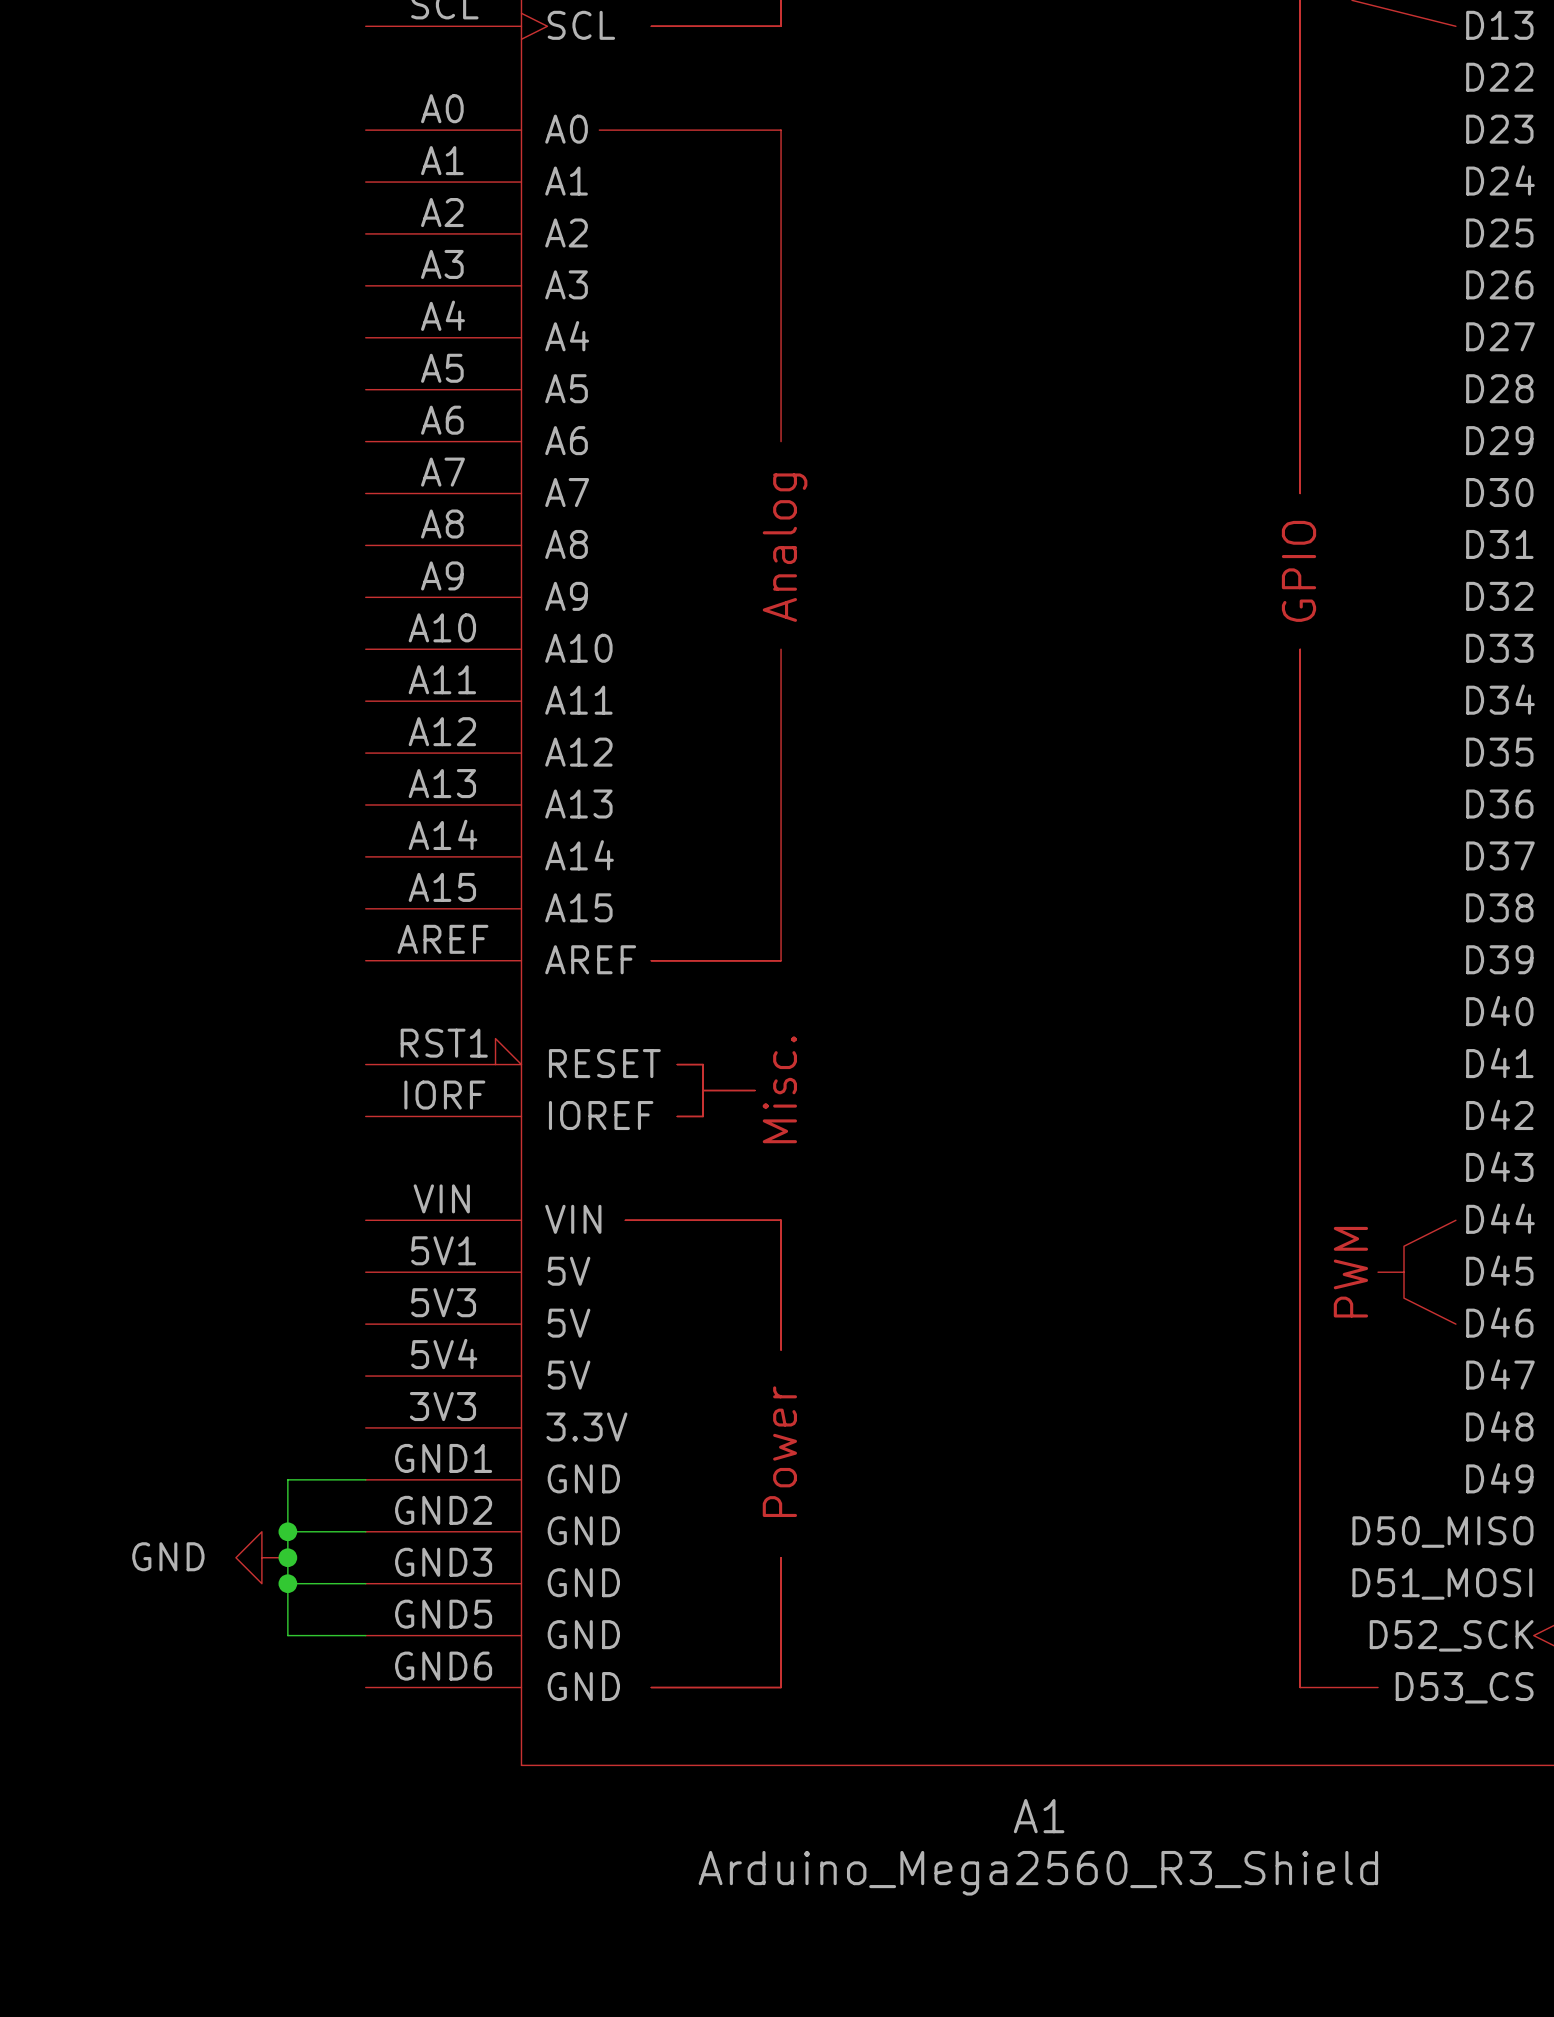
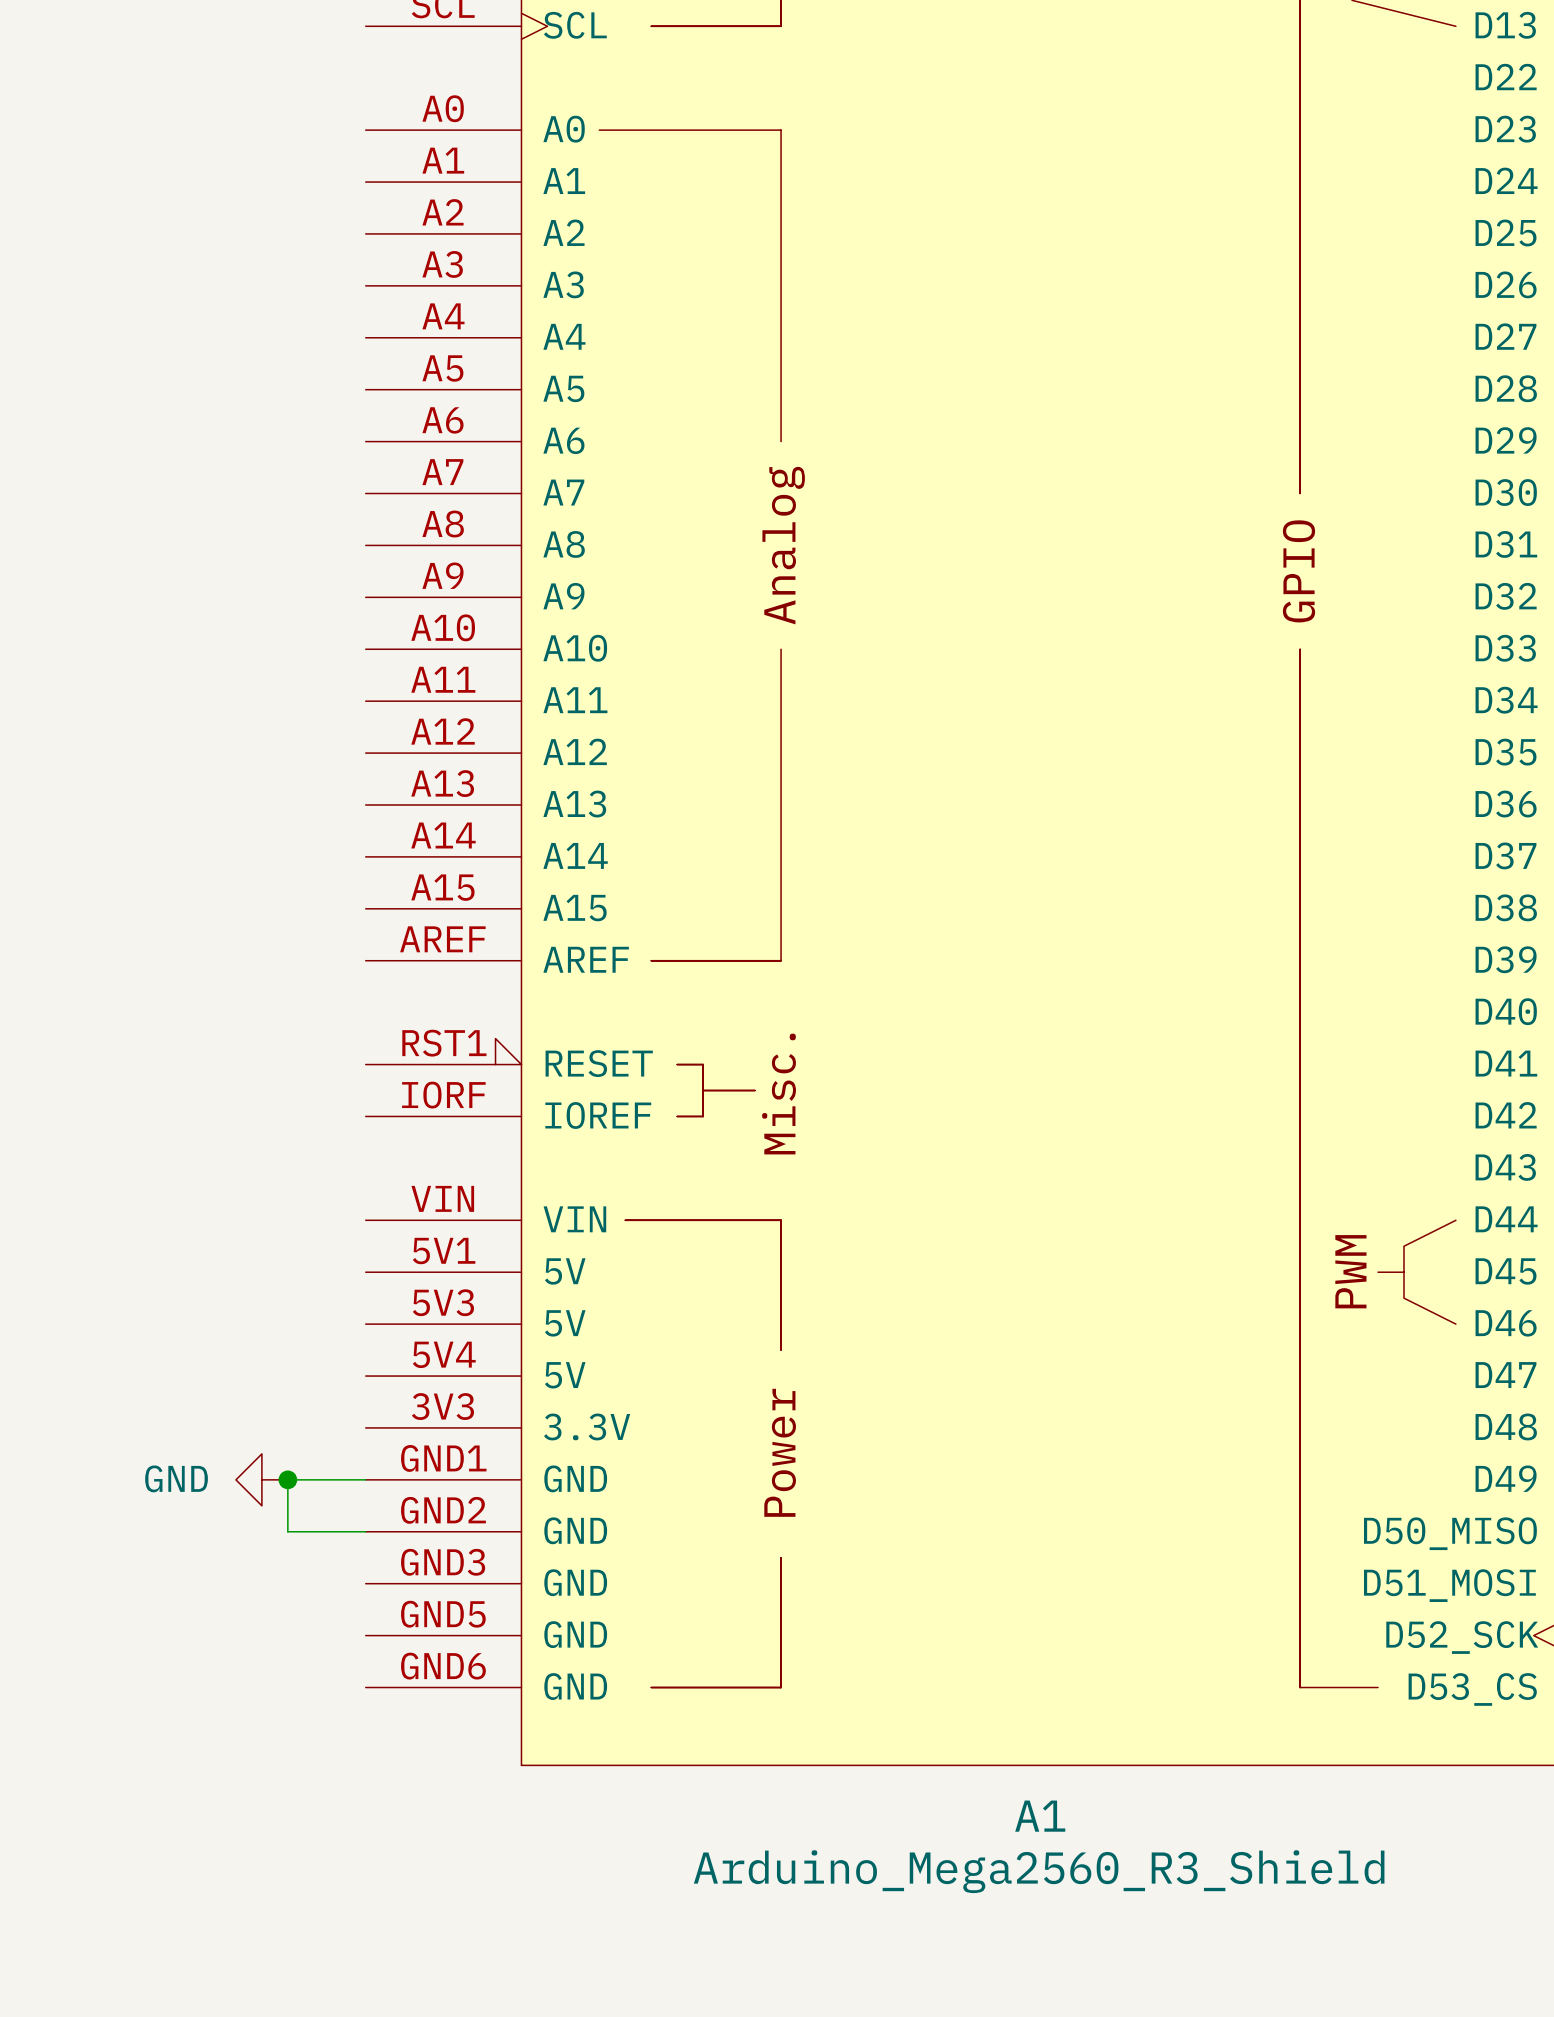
junction: none -> (287, 1479)
wire: (287, 1531) (287, 1635) (365, 1635) -> none
junction: (287, 1531) -> none
power symbol position: GND (261, 1557) -> GND (261, 1479)
junction: (287, 1557) -> none
wire: (287, 1583) (365, 1583) -> none
junction: (287, 1583) -> none

